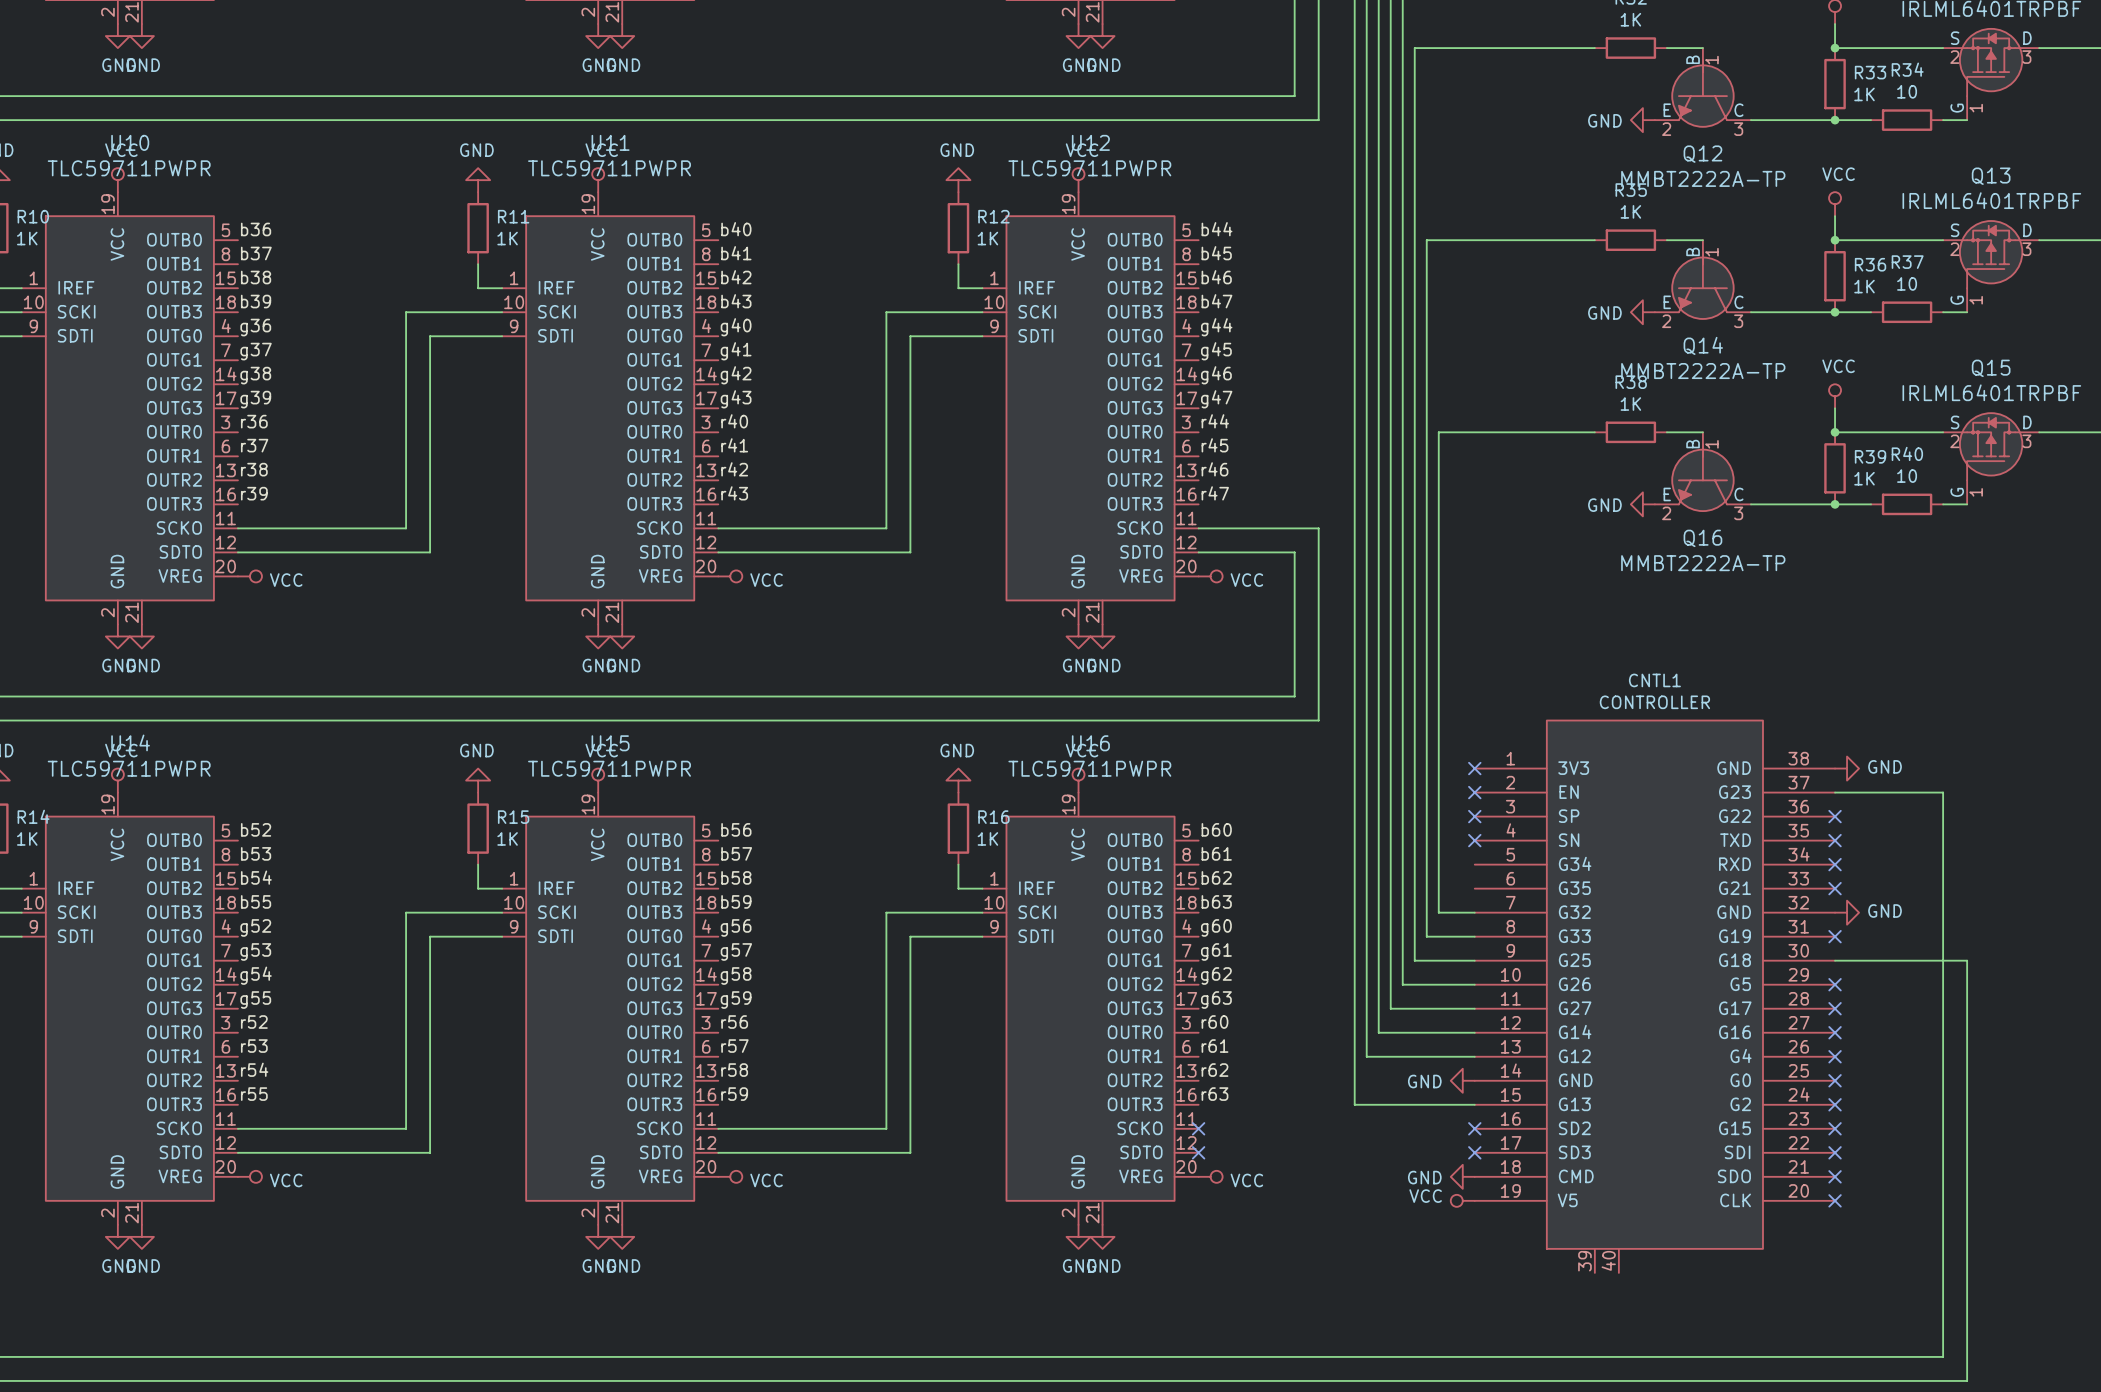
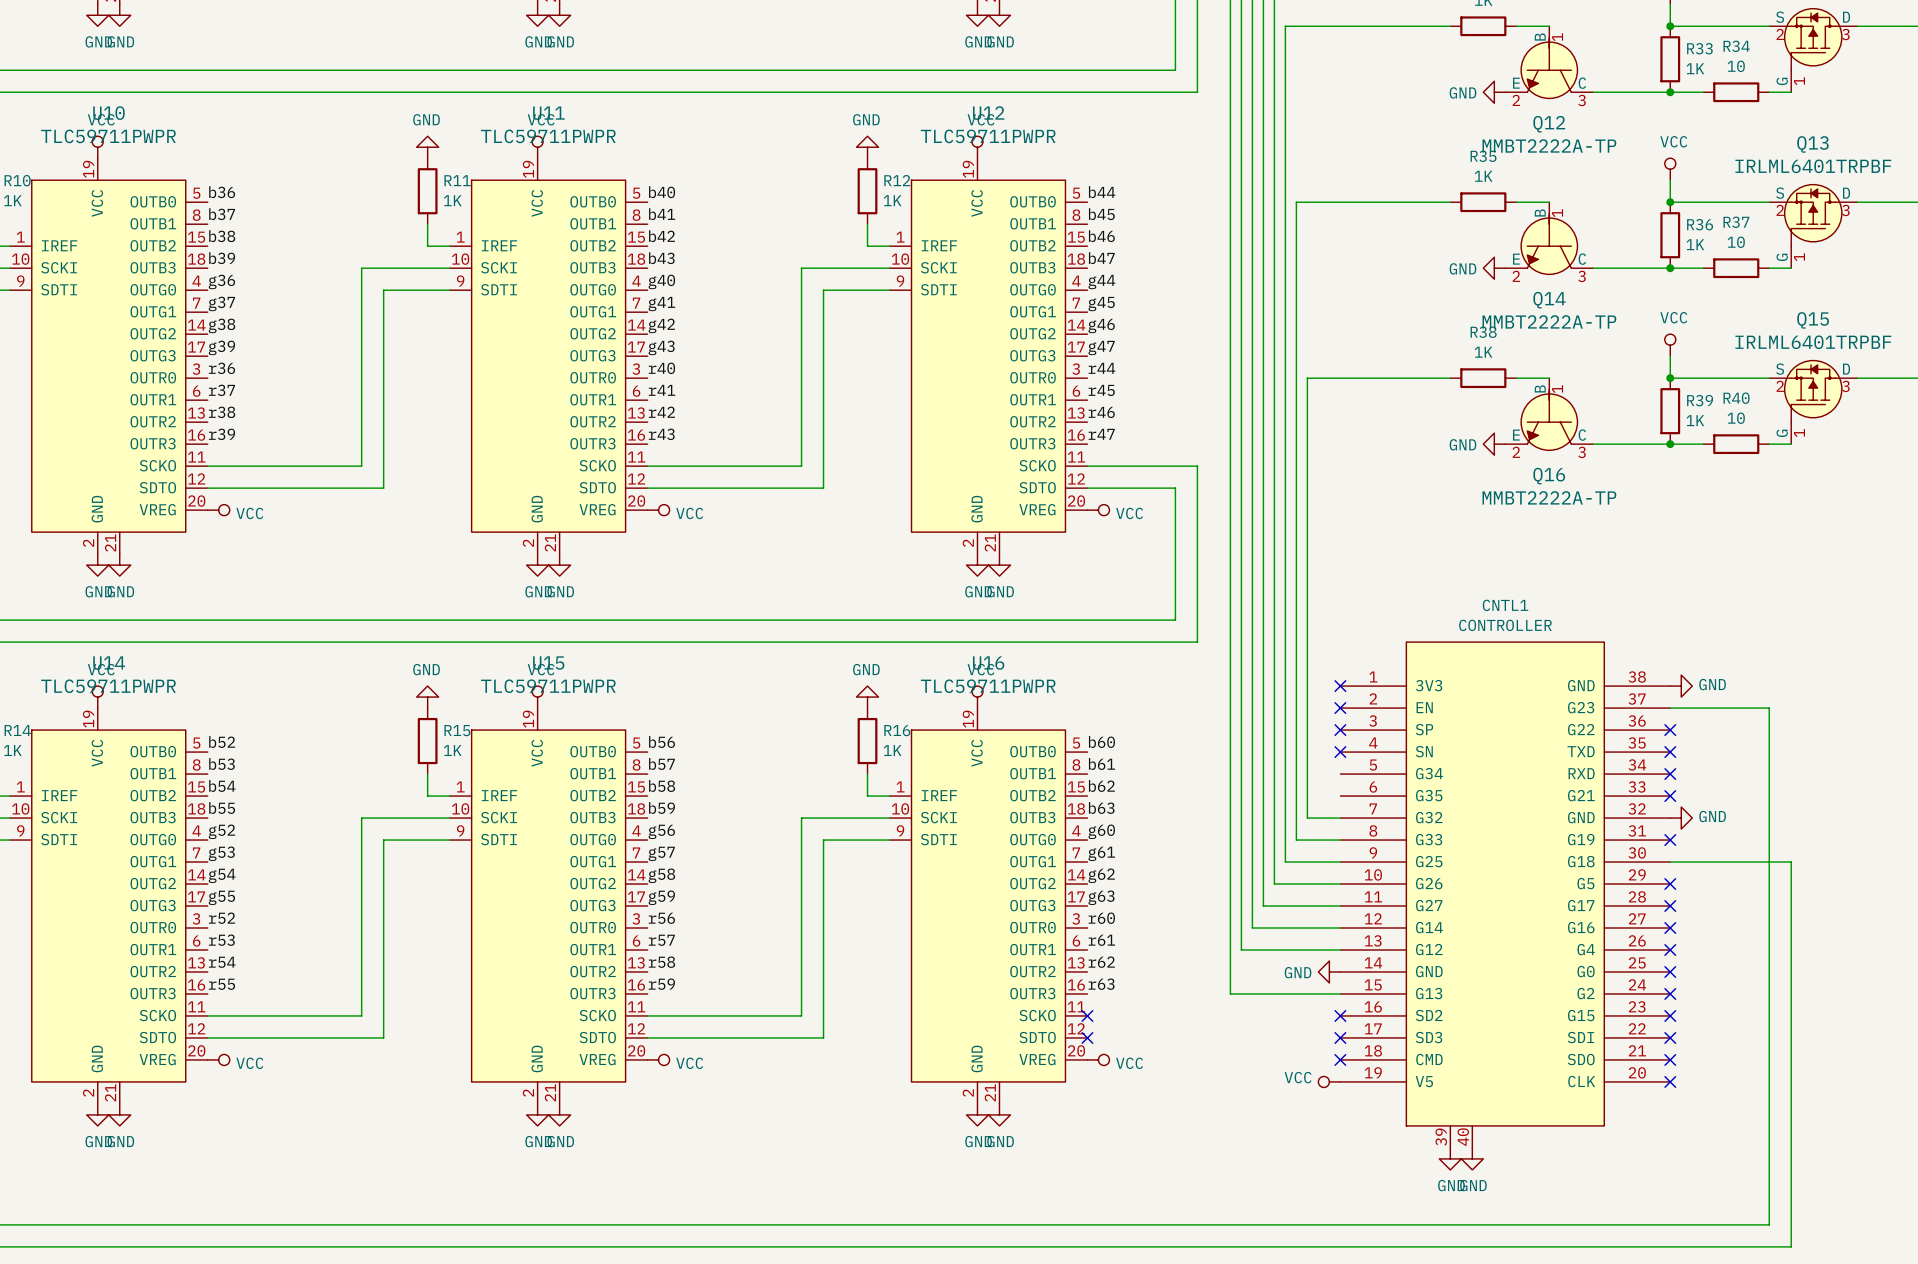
power symbol: GND (1462, 1176) -> none
no-connect mark: none -> (1340, 1059)
power symbol: none -> GND (1450, 1158)
power symbol: none -> GND (1472, 1158)

